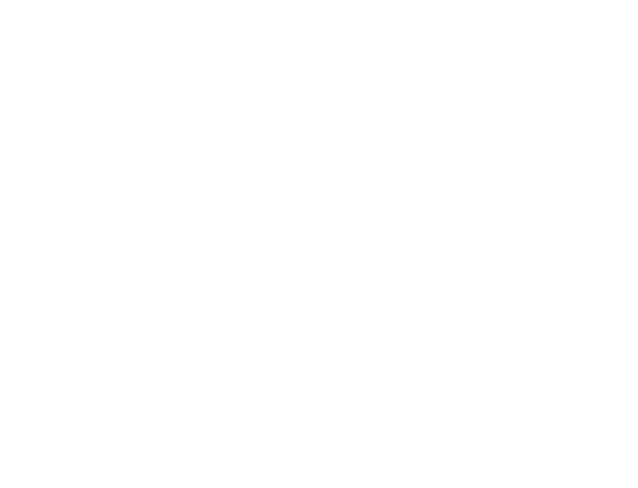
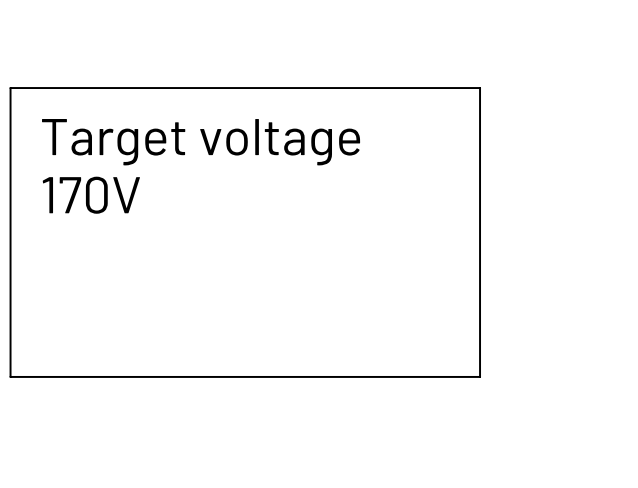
line: none -> (10, 88) (480, 88) (480, 376) (10, 376) (10, 88)
text: none -> Target voltage (201, 142)
text: none -> 170V (91, 195)

